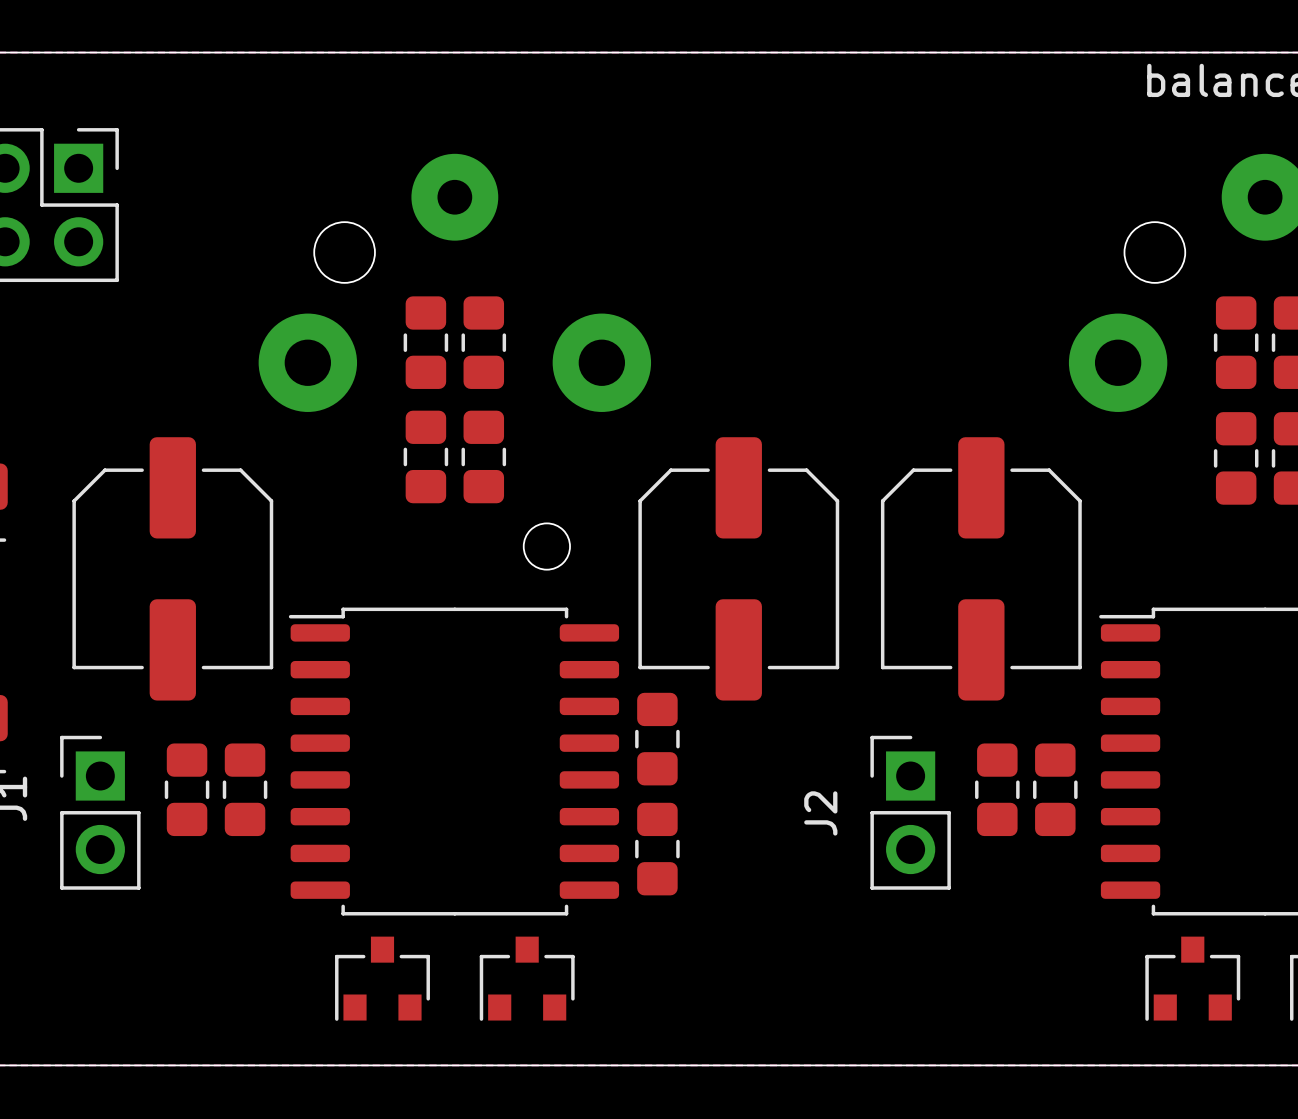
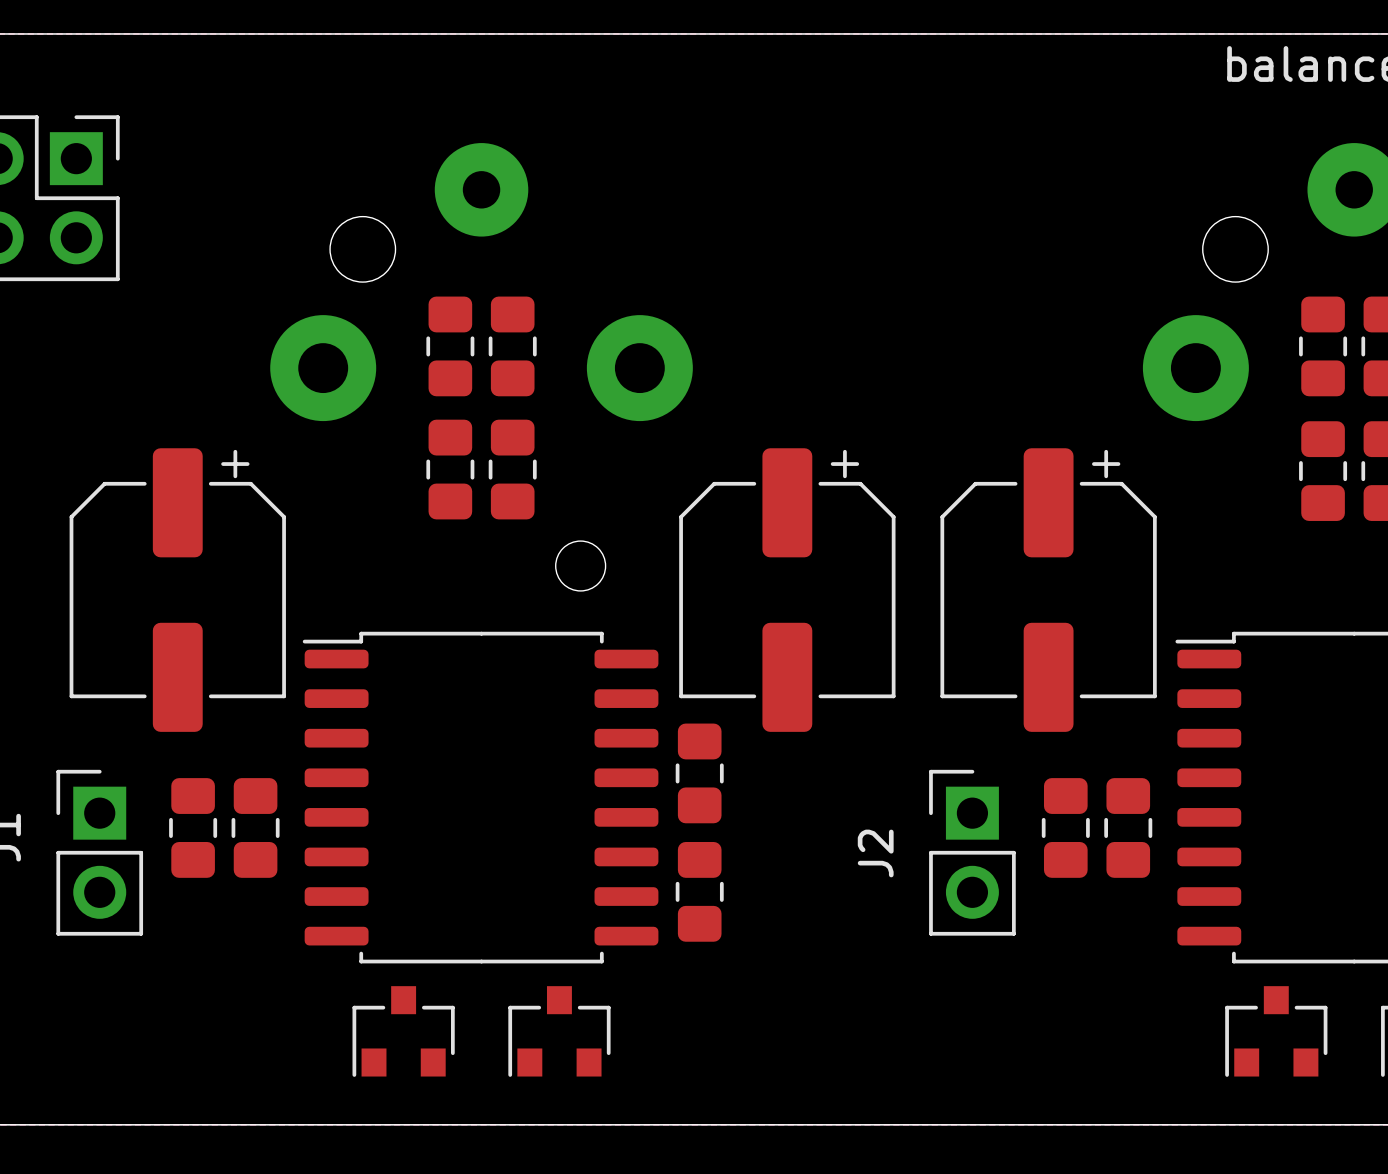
part footprint: [72, 437, 274, 701] -> [69, 448, 286, 732]
part footprint: [638, 437, 840, 701] -> [679, 448, 896, 732]
part footprint: [880, 437, 1082, 701] -> [940, 448, 1157, 732]

